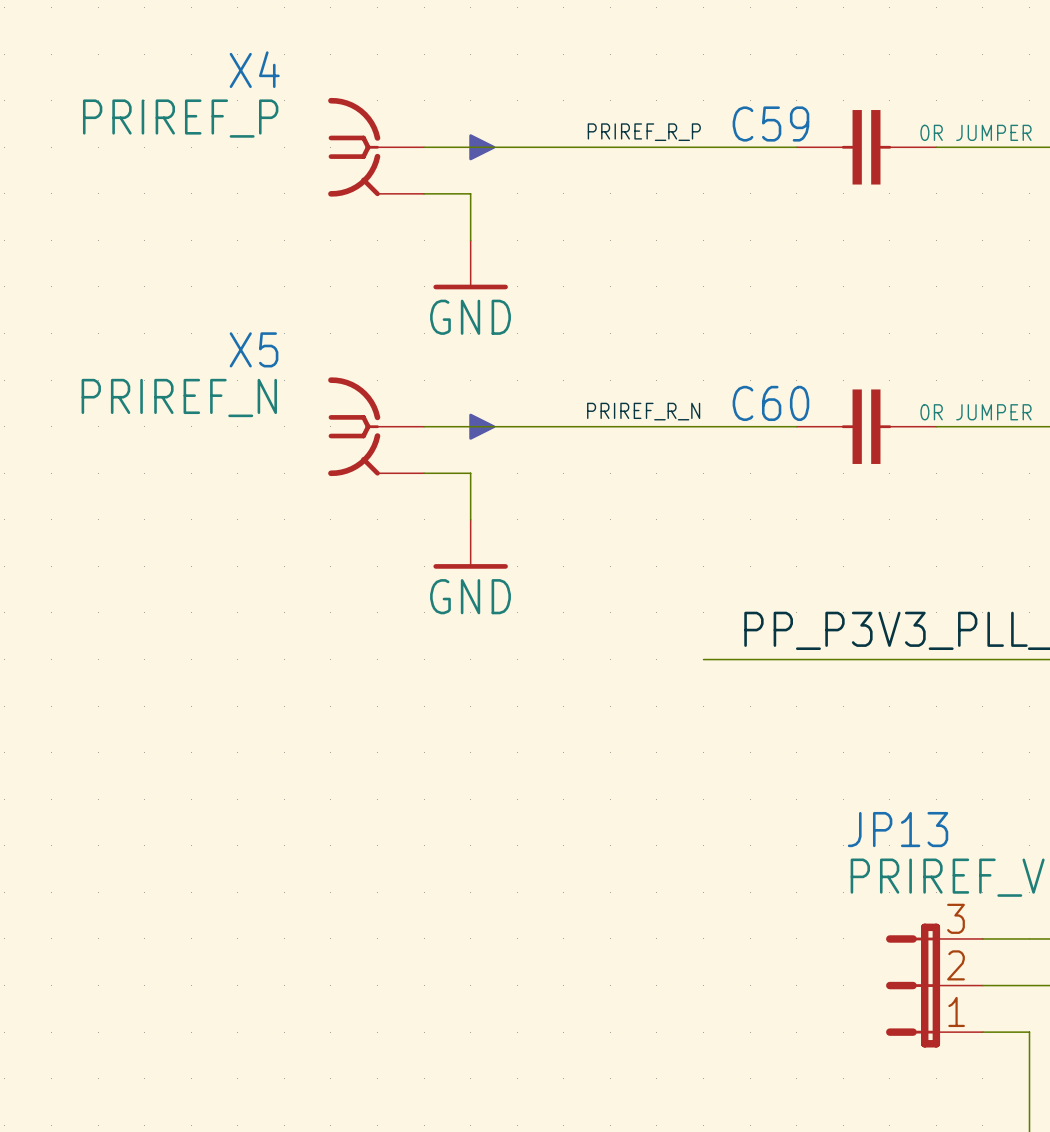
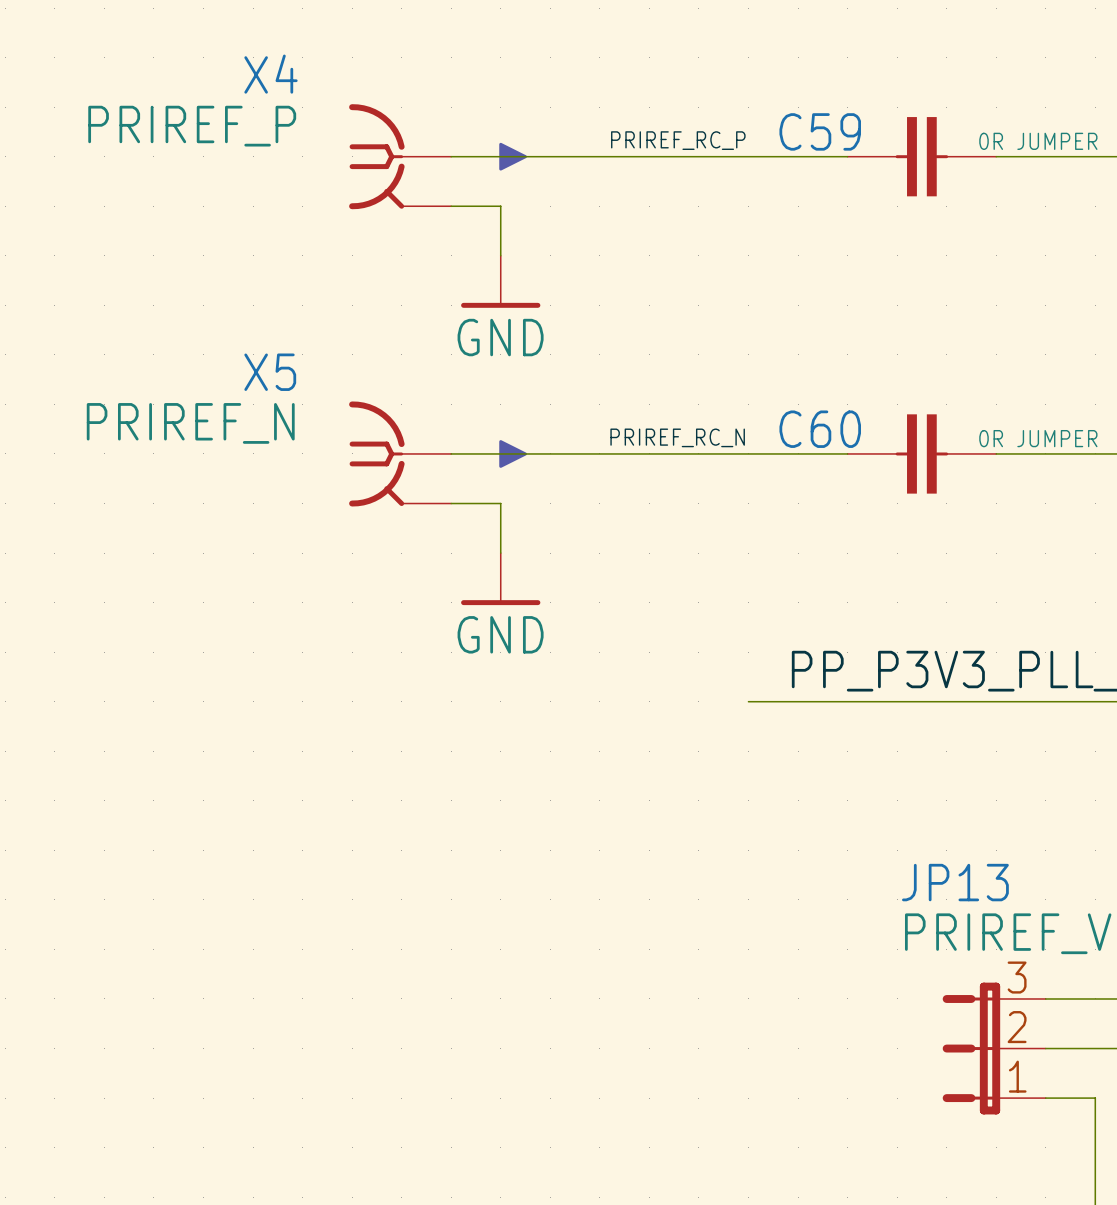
label: PRIREF_R_P (644, 132) -> PRIREF_RC_P (678, 140)
label: PRIREF_R_N (643, 411) -> PRIREF_RC_N (677, 437)

